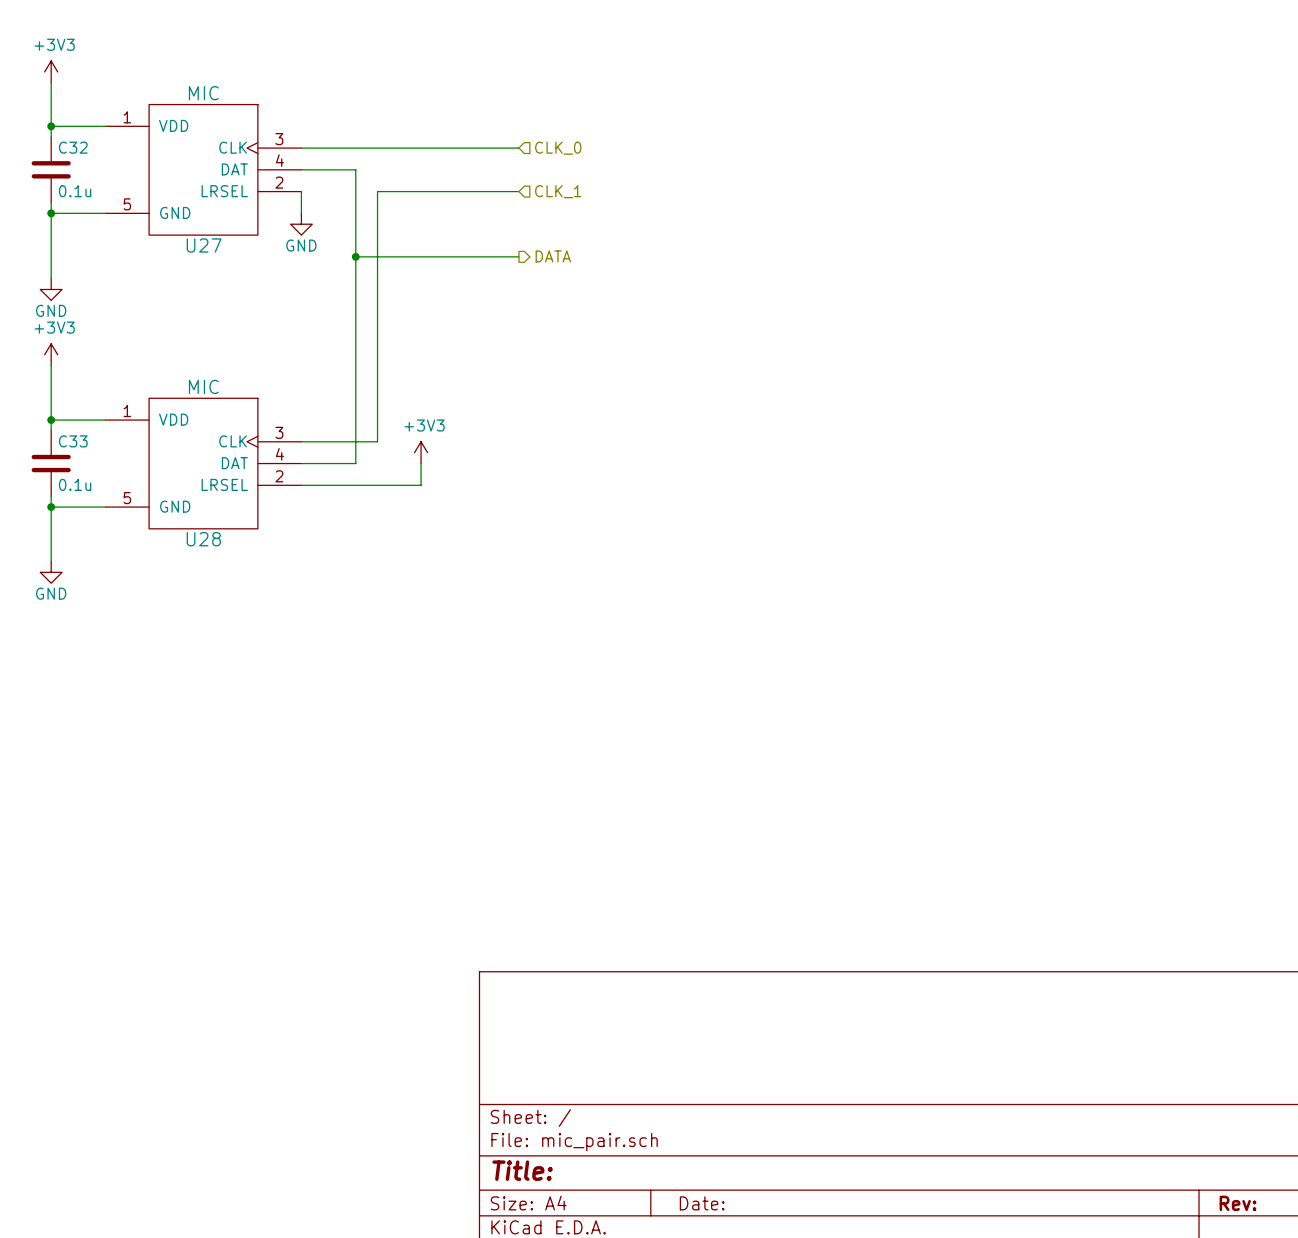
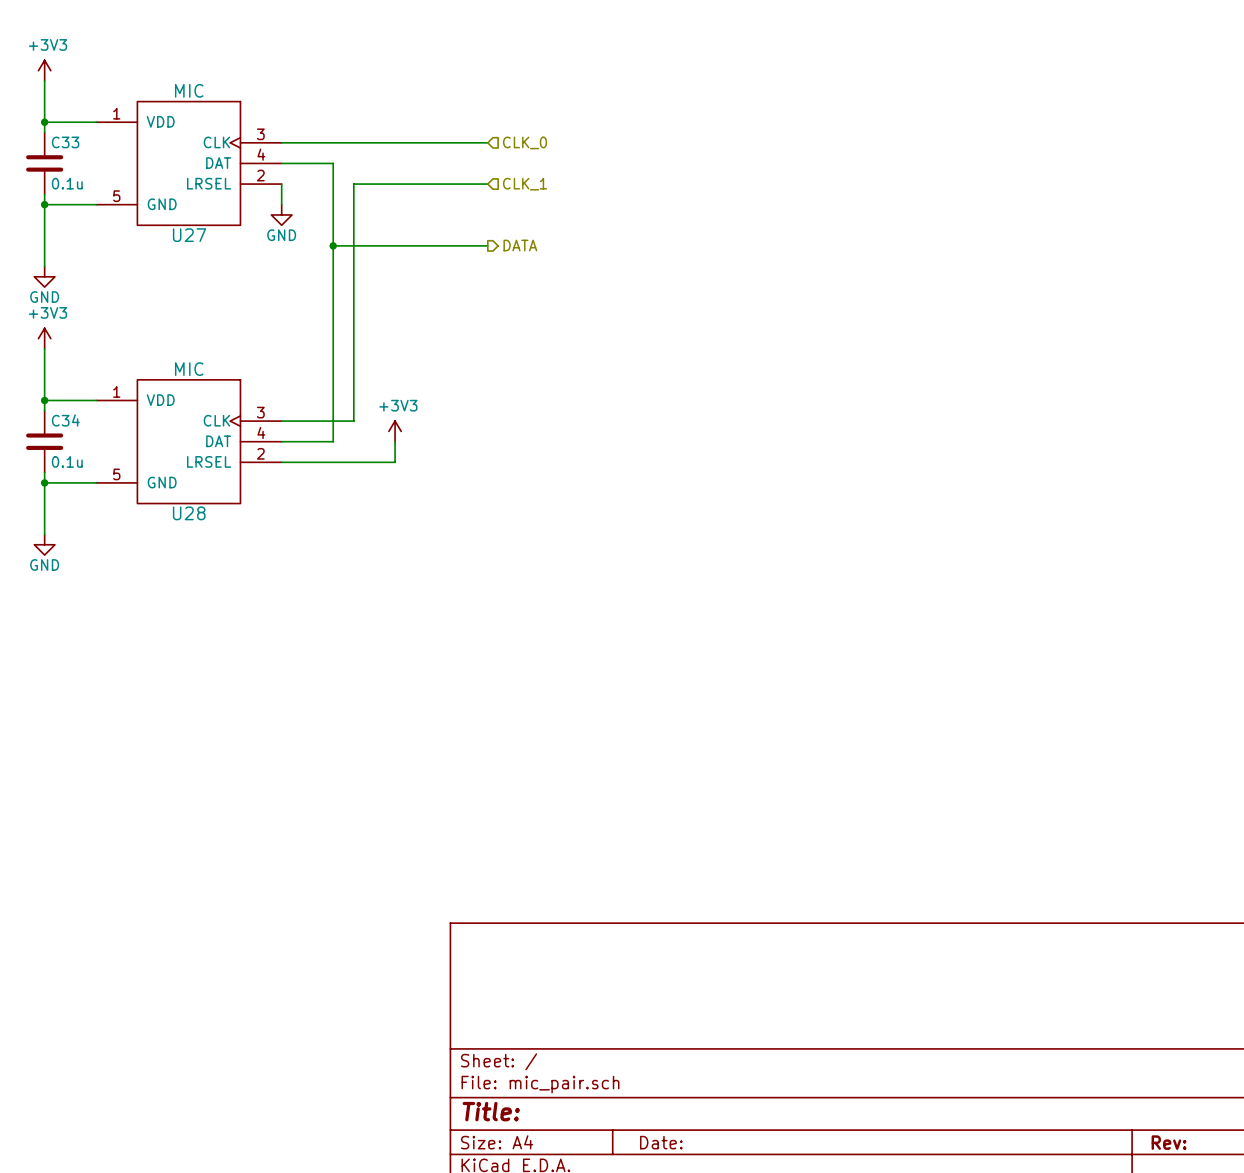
C32 name: C32 (73, 147) -> C33 (65, 142)
C33 name: C33 (73, 441) -> C34 (65, 420)

